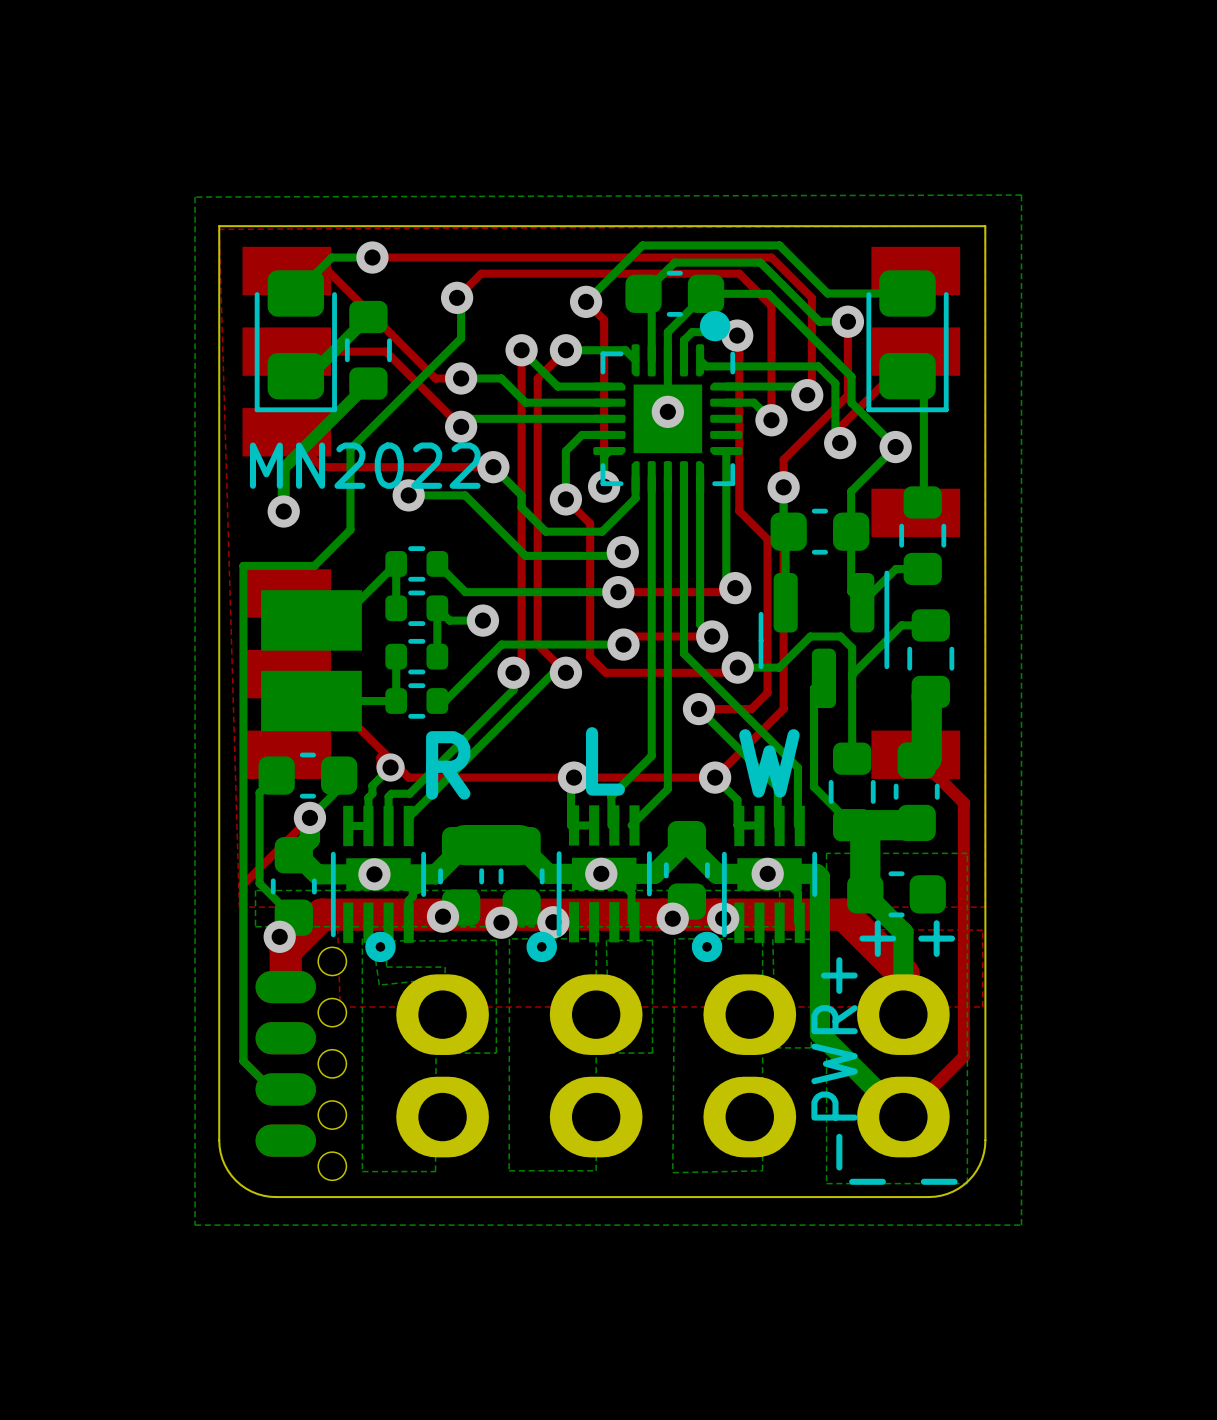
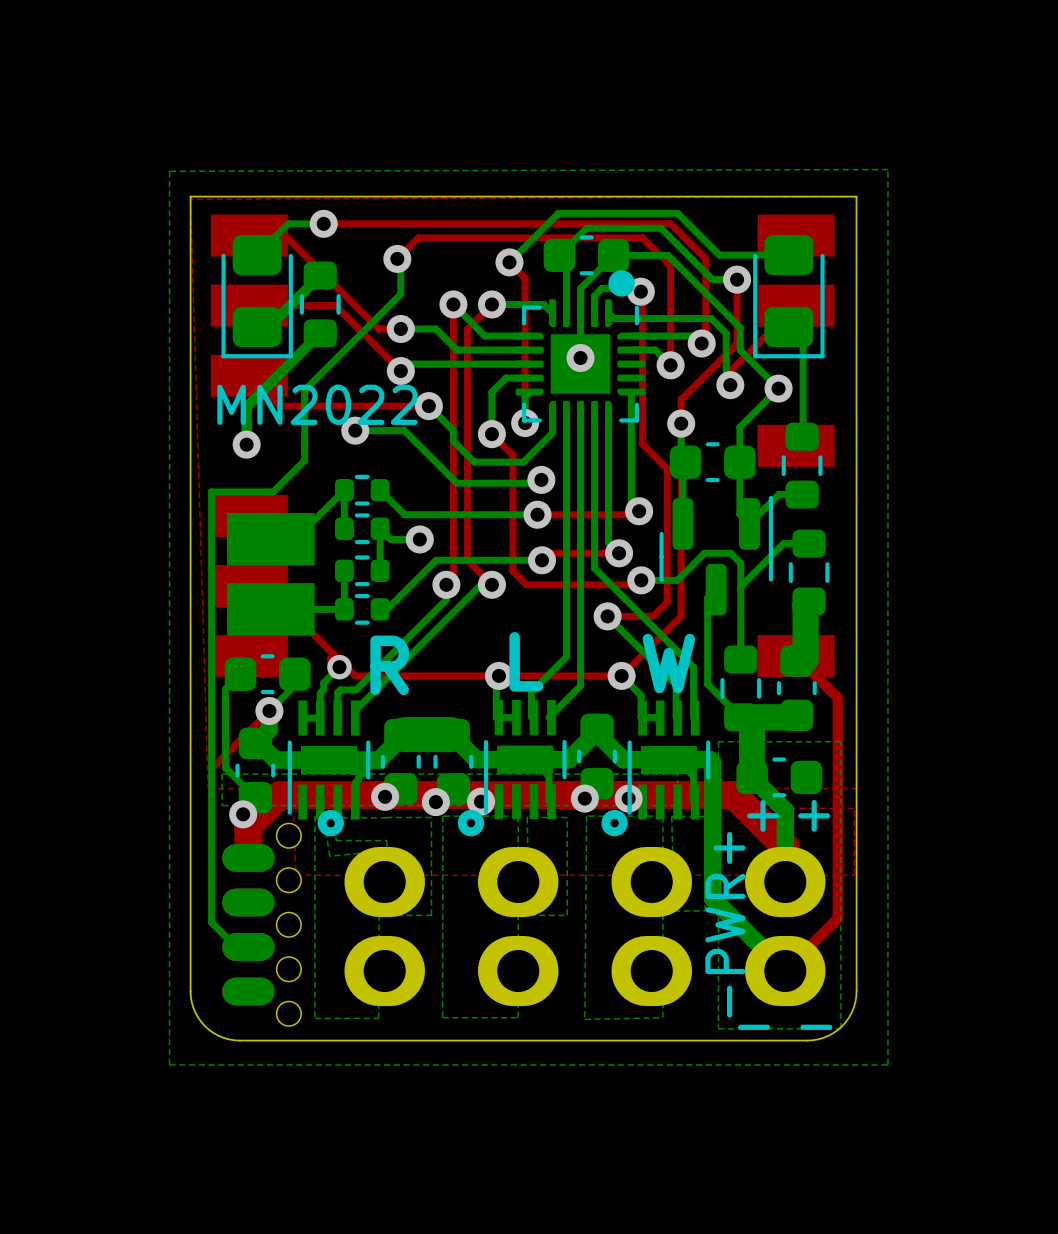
via: (601, 873) -> none
via: (767, 873) -> none
via: (374, 874) -> none

